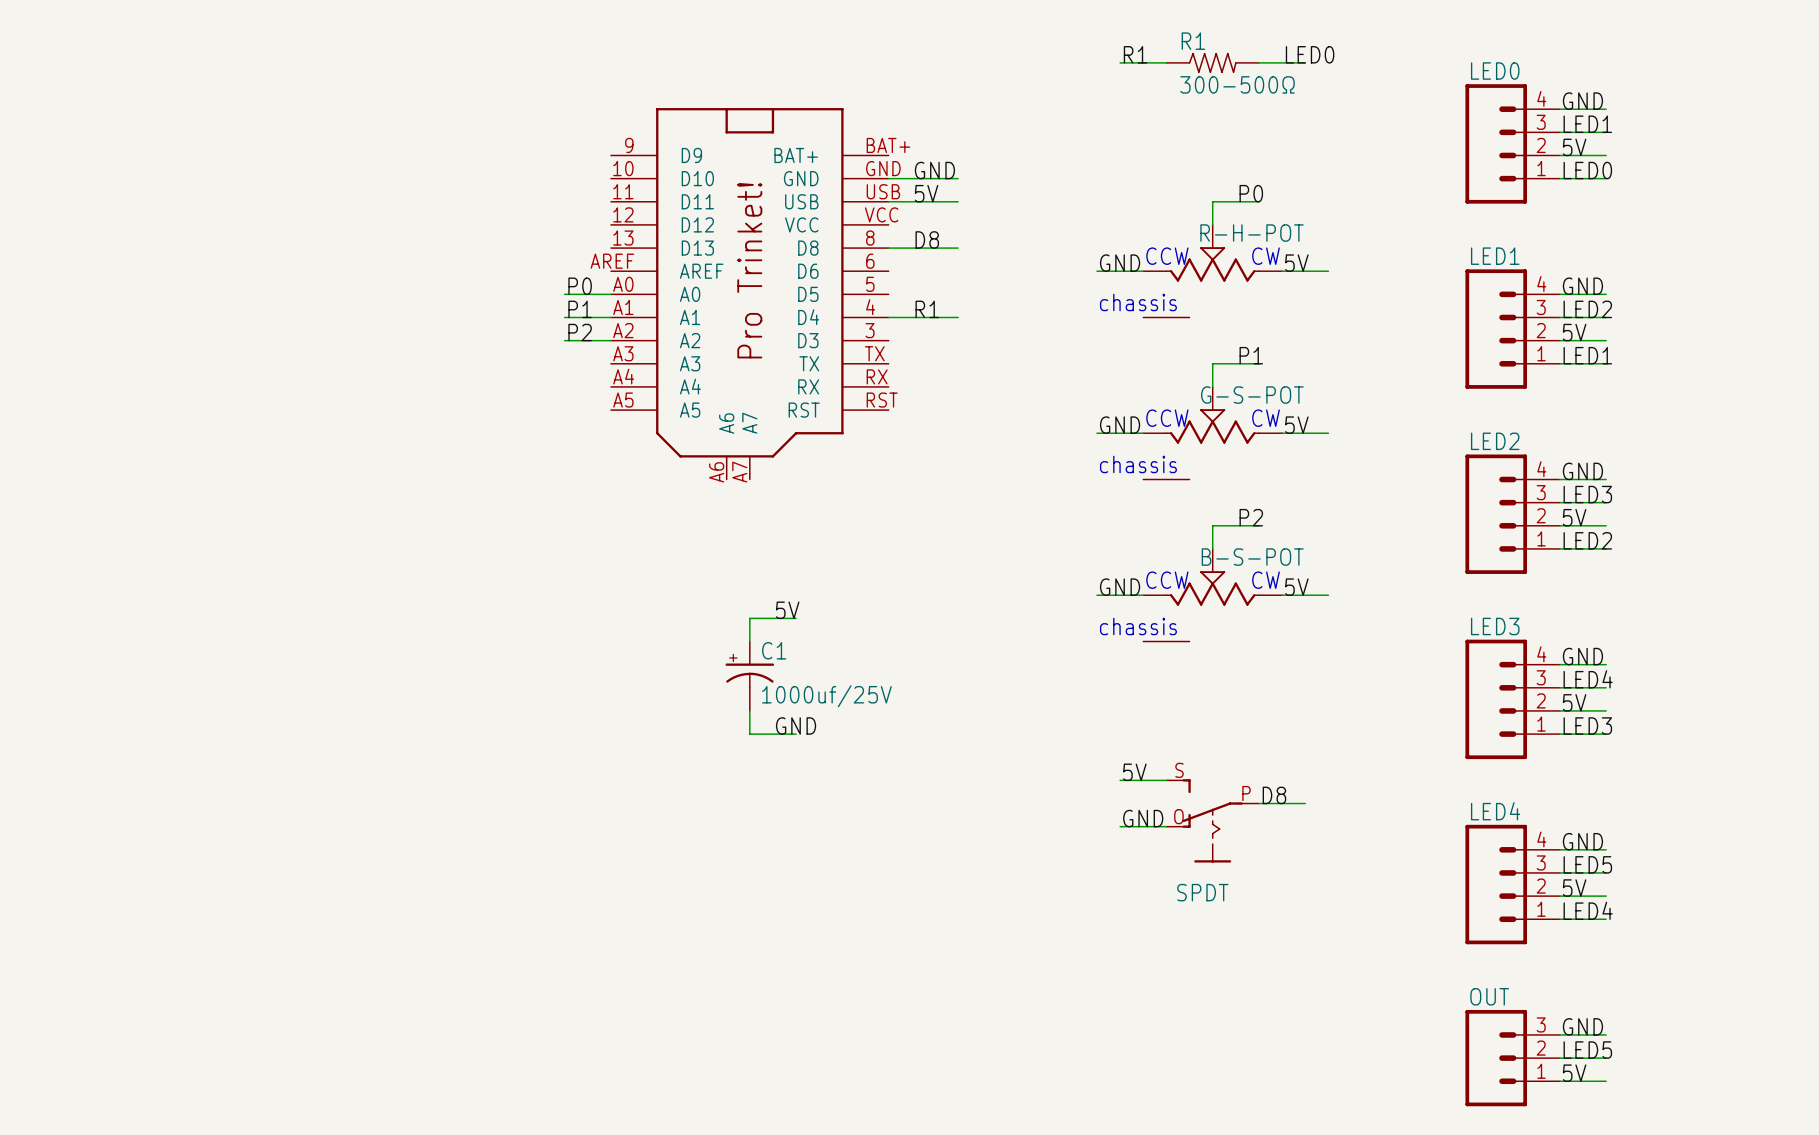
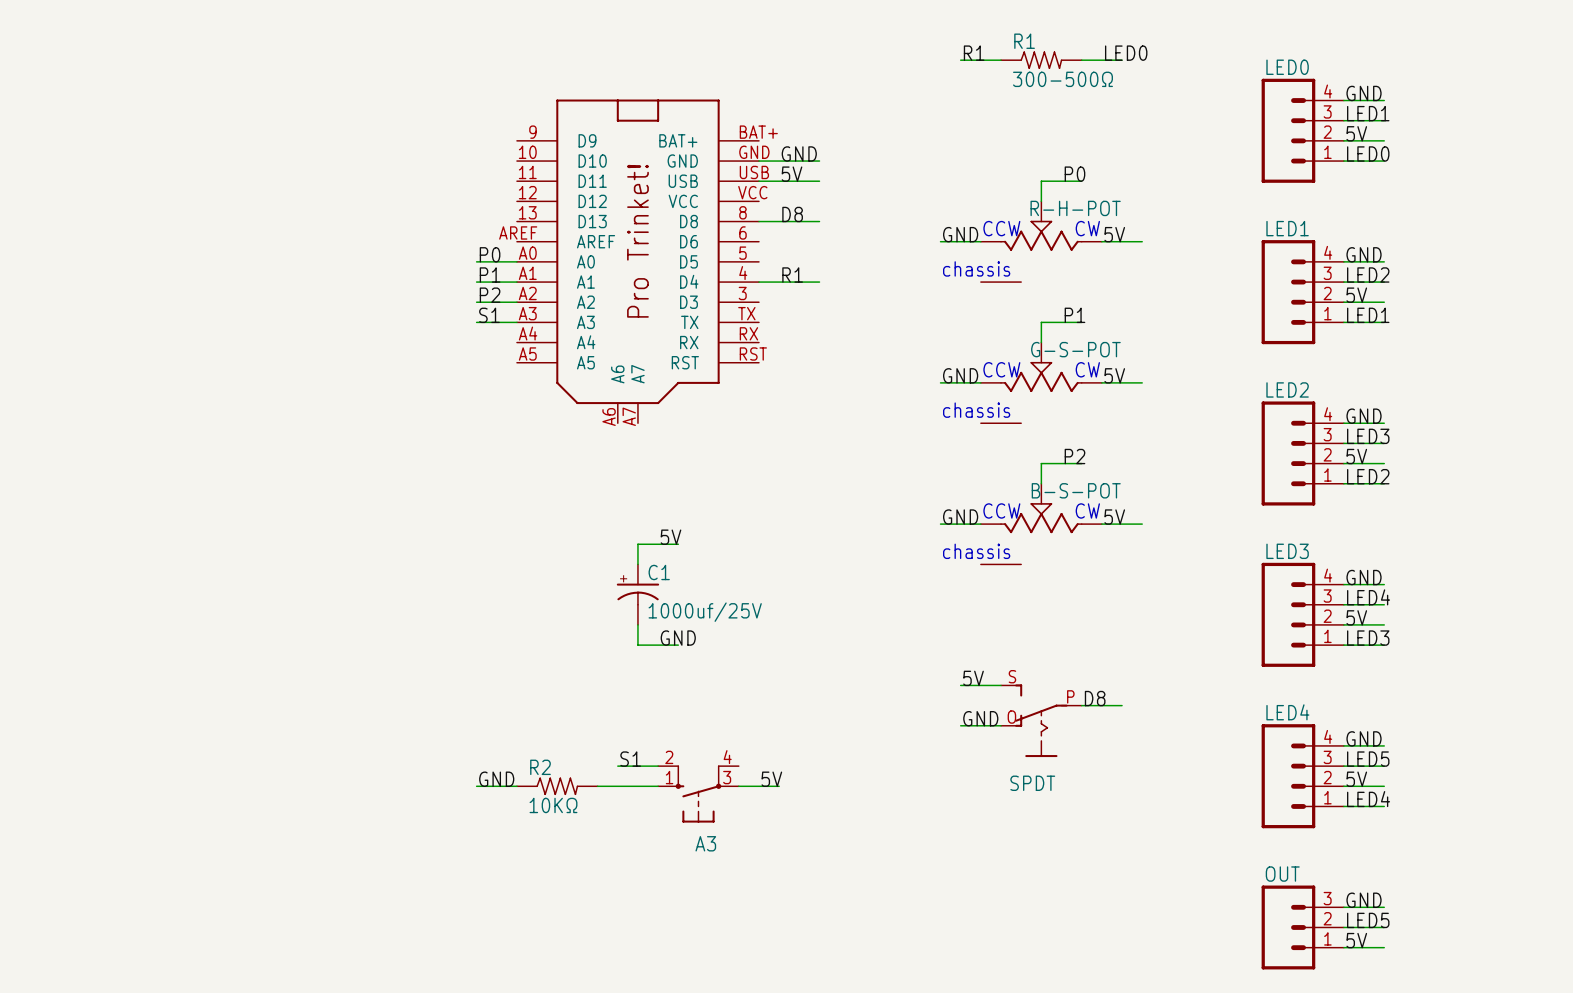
label: none -> S1 (489, 315)
wire: none -> (476, 322) (516, 322)
label: none -> S1 (630, 759)
wire: none -> (617, 766) (658, 766)
label: none -> GND (496, 779)
label: none -> 5V (771, 779)
wire: none -> (476, 786) (516, 786)
R2: none -> 10KΩ (557, 786)
wire: none -> (597, 786) (658, 786)
wire: none -> (738, 786) (779, 786)
A3: none -> (698, 794)

